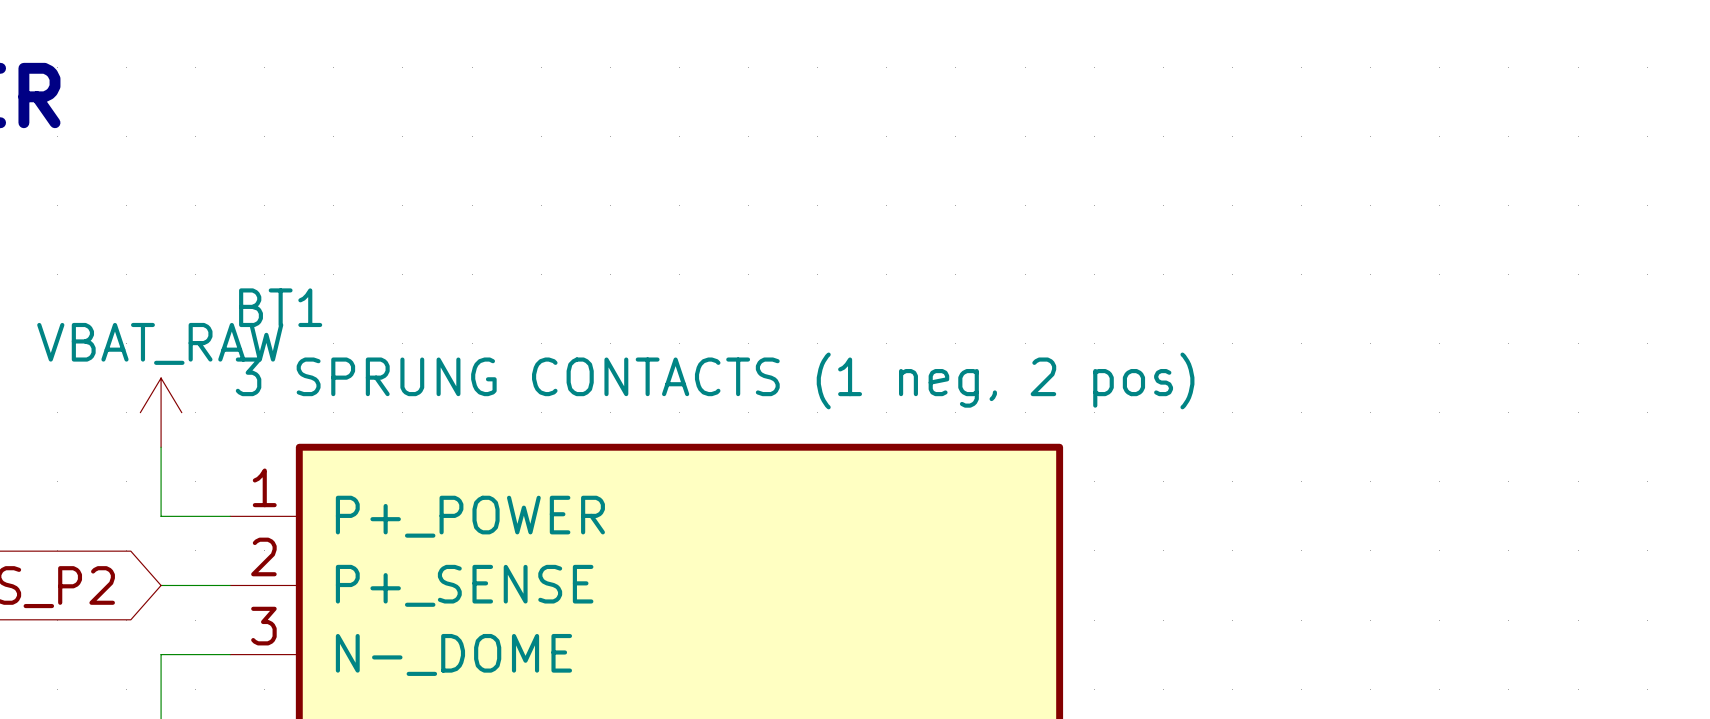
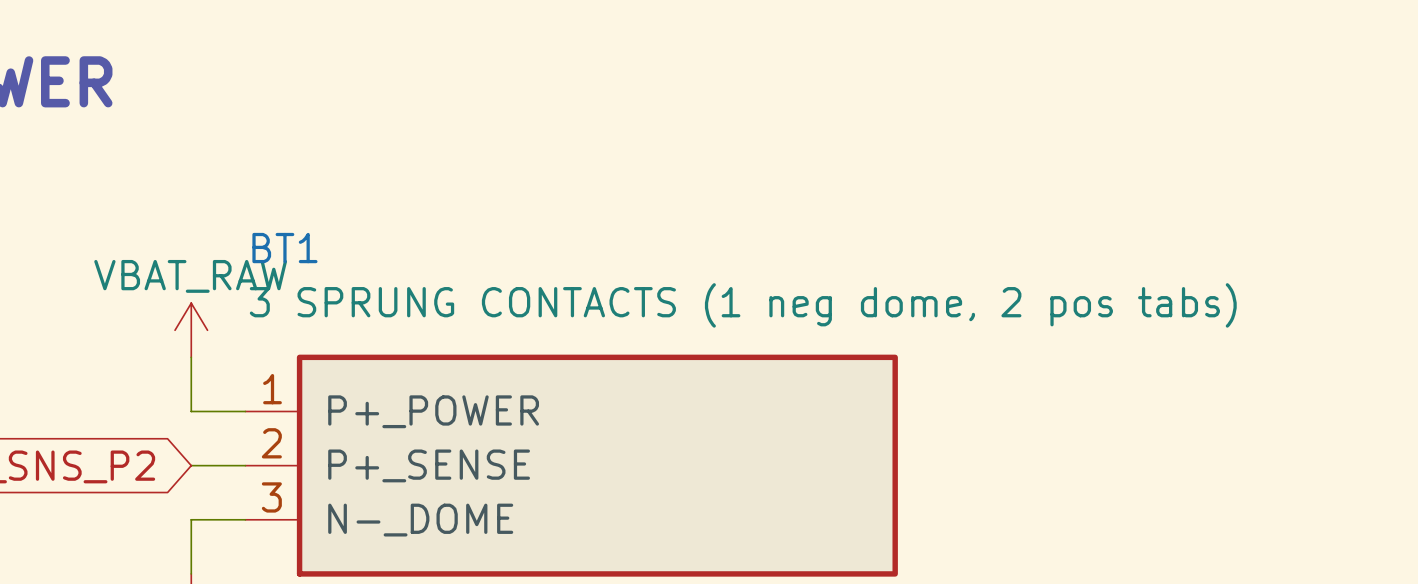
BT1 value: 3 SPRUNG CONTACTS (1 neg, 2 pos) (715, 380) -> 3 SPRUNG CONTACTS (1 neg dome, 2 pos tabs) (743, 305)

